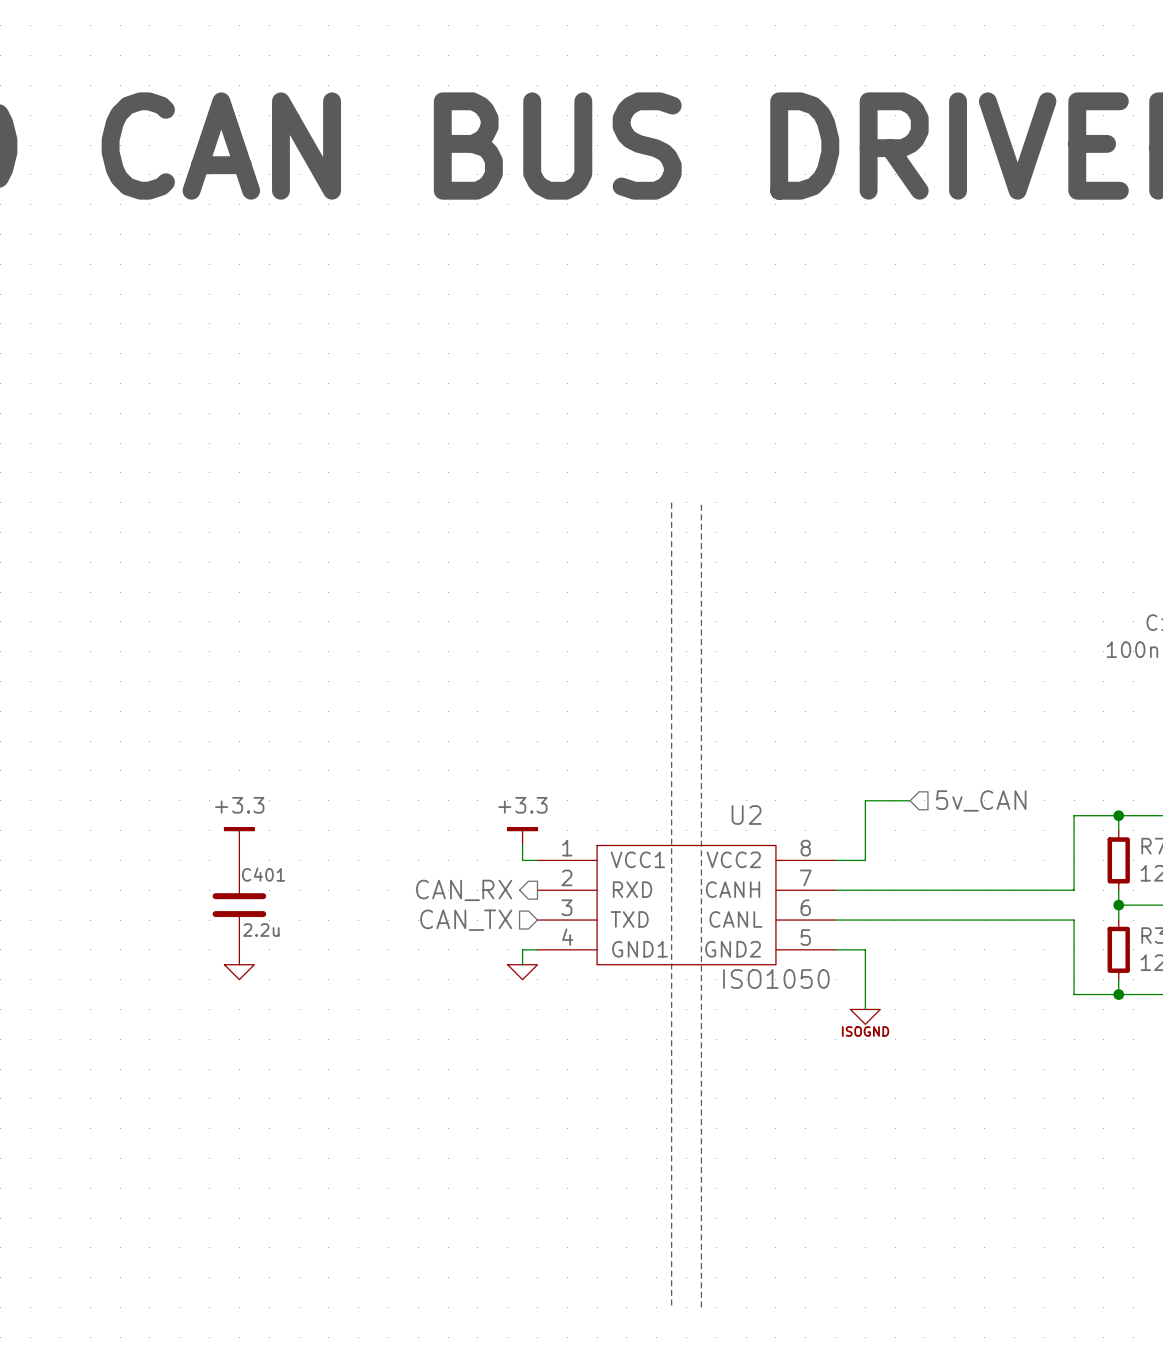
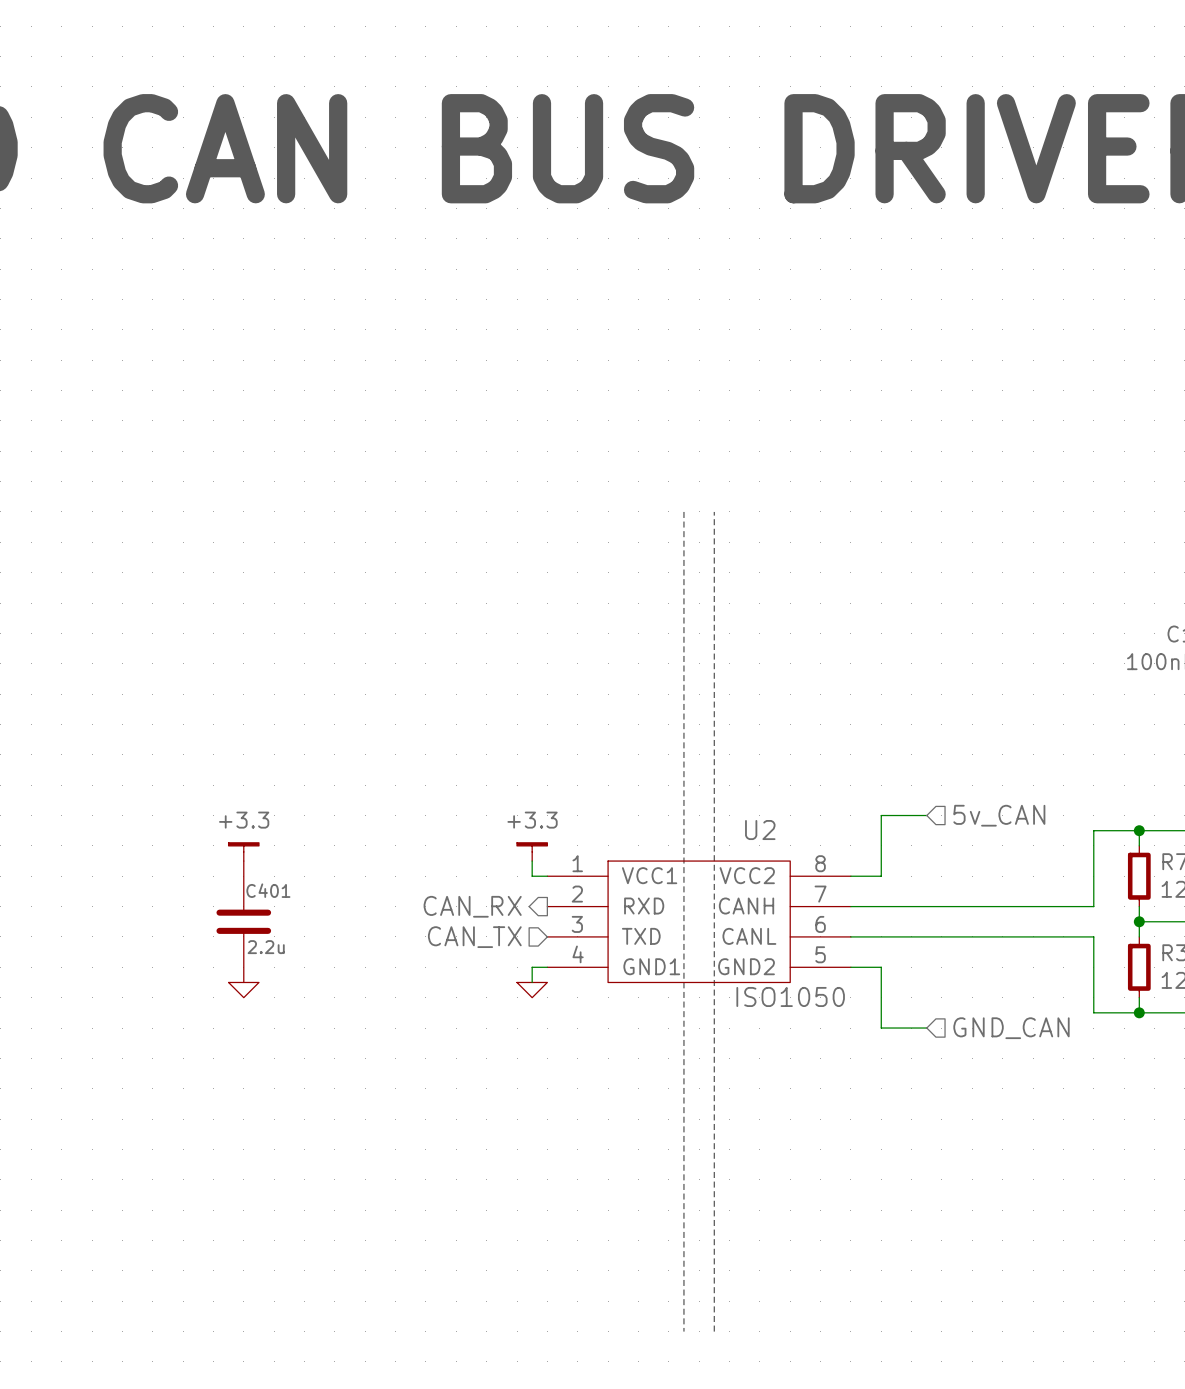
wire: none -> (881, 1028) (926, 1028)
hierarchical label: none -> GND_CAN (1011, 1028)
power symbol: (865, 1016) -> none

